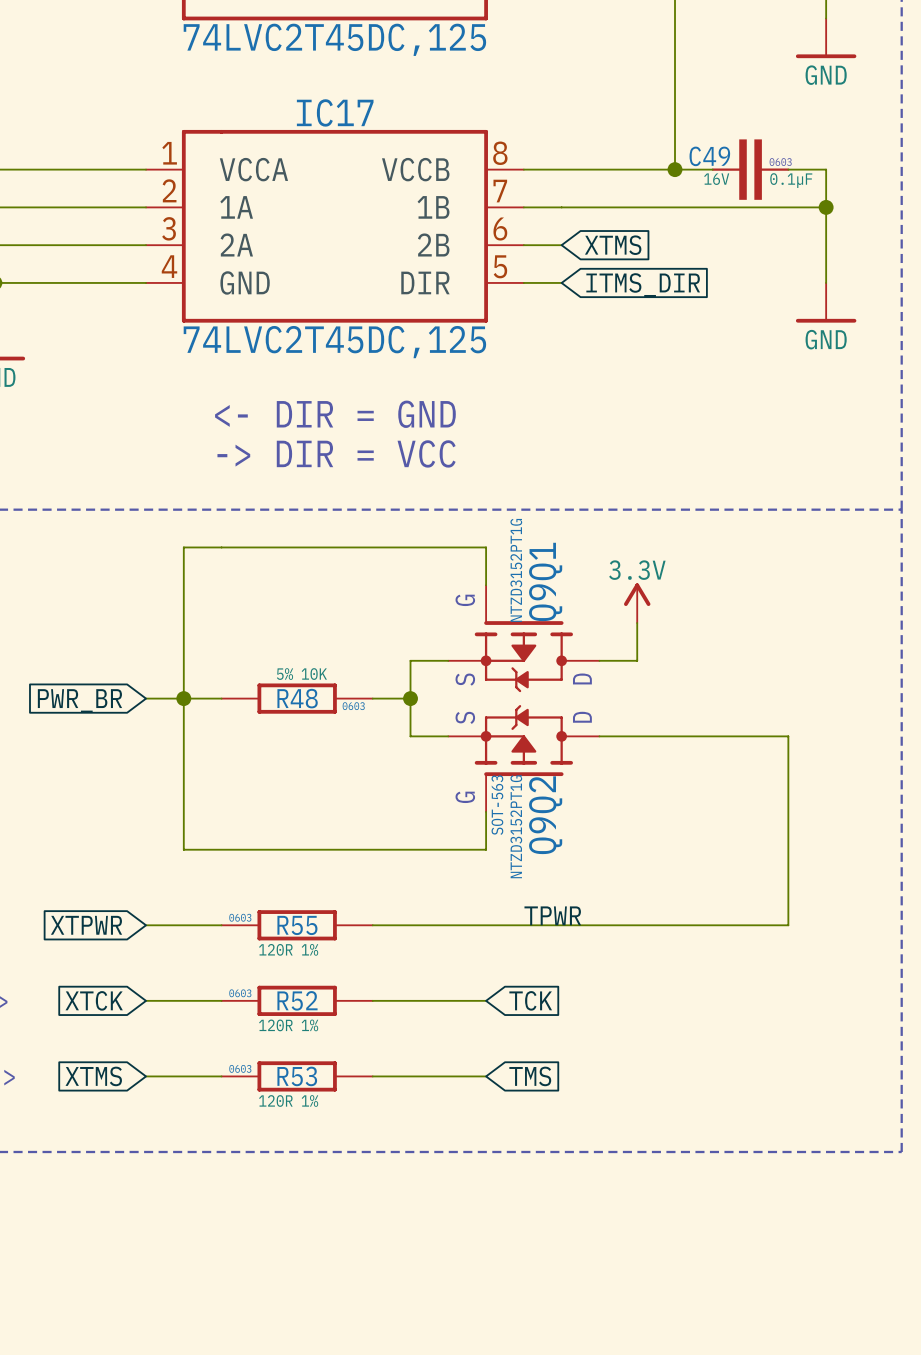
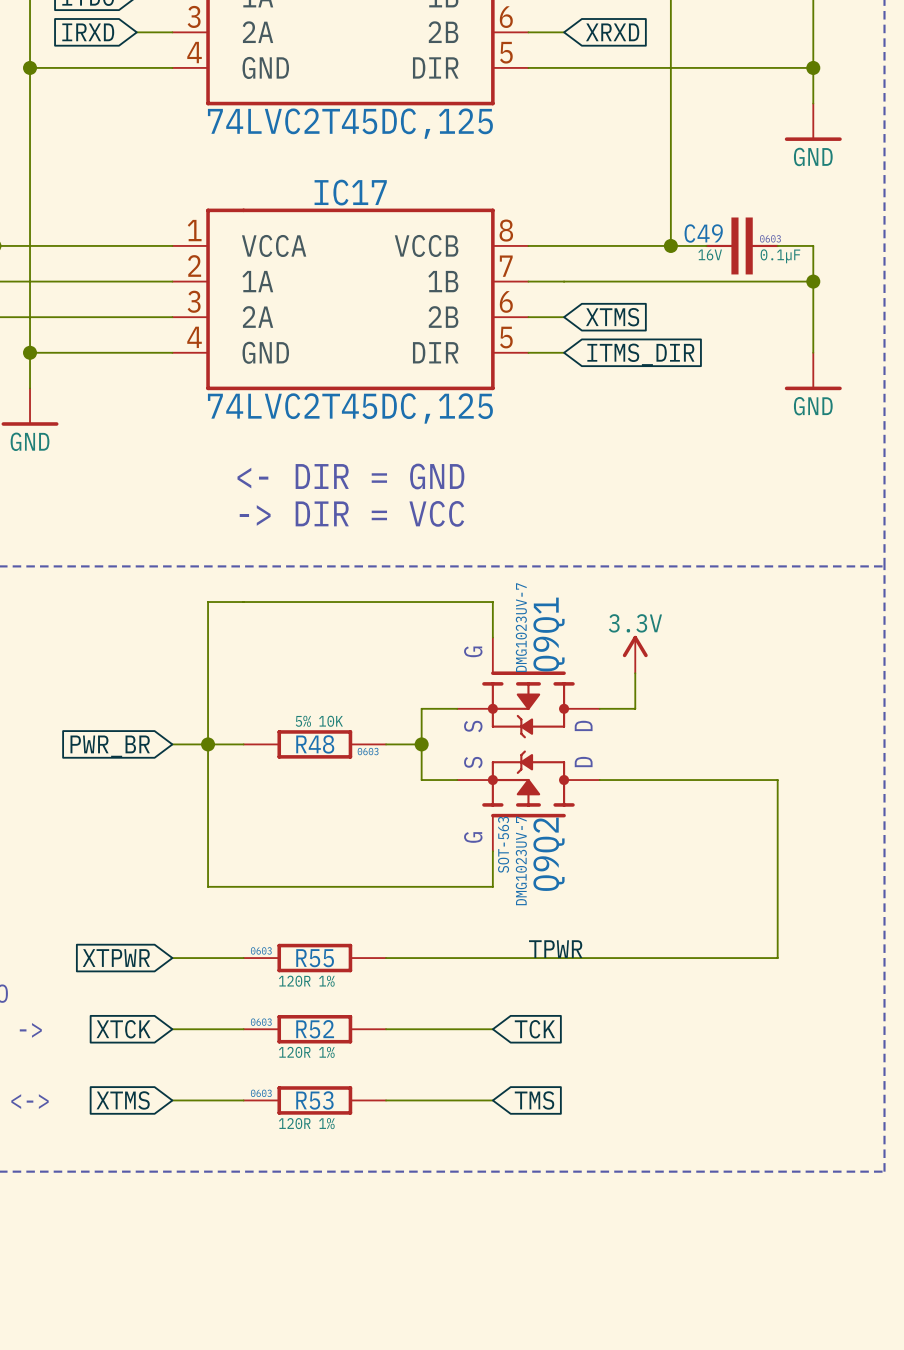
Q9Q1 text: NTZD3152PT1G (516, 570) -> DMG1023UV-7 (521, 627)
Q9Q2 text: NTZD3152PT1G (516, 826) -> DMG1023UV-7 (521, 860)

